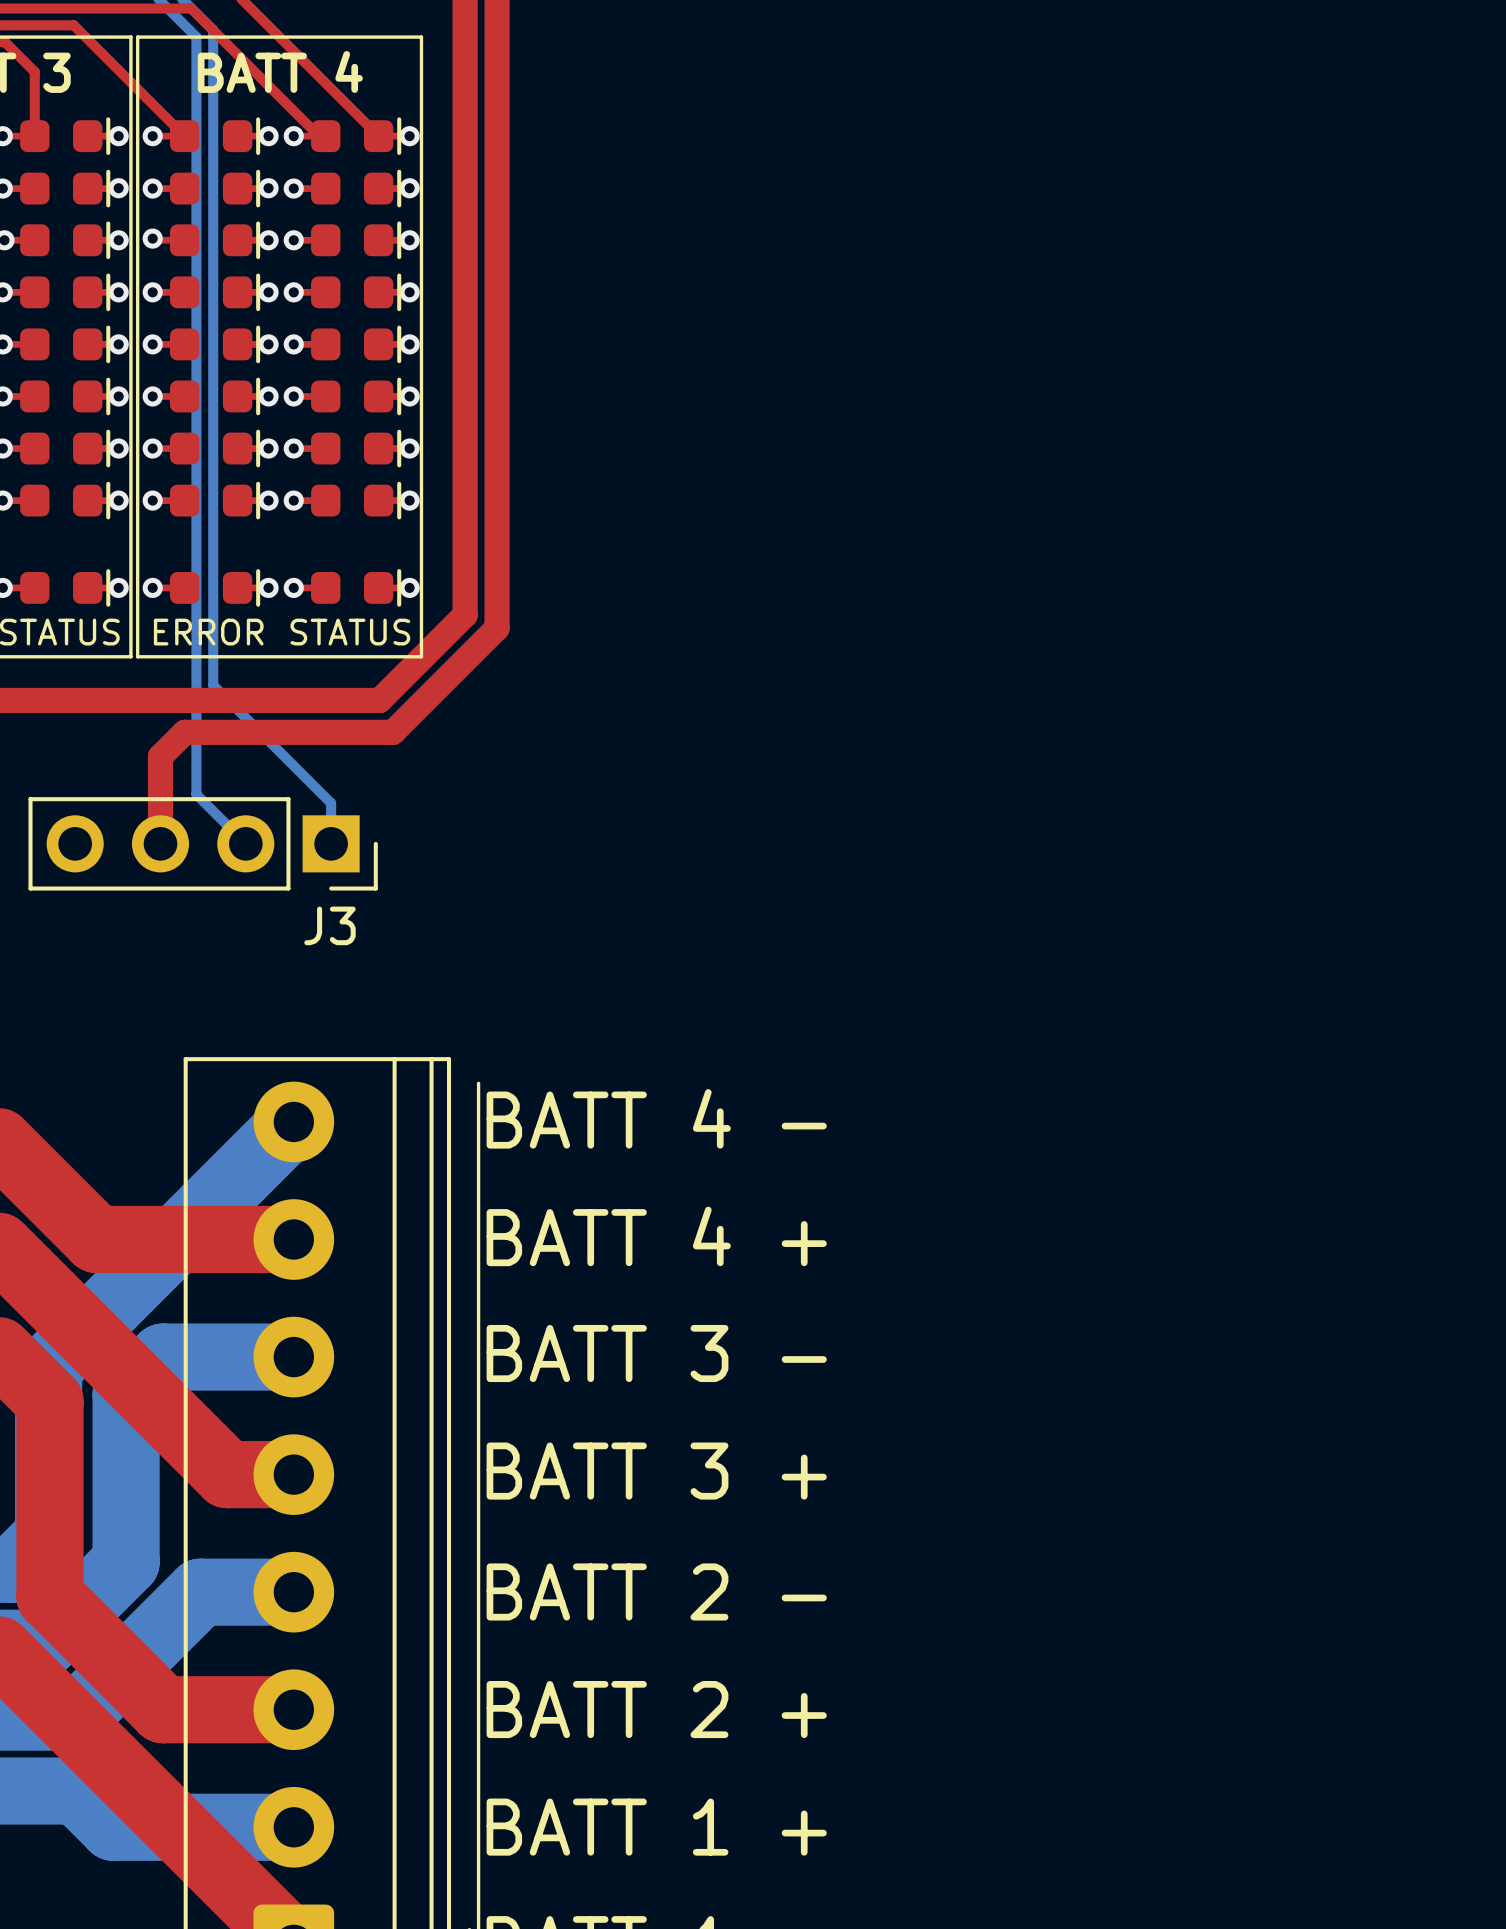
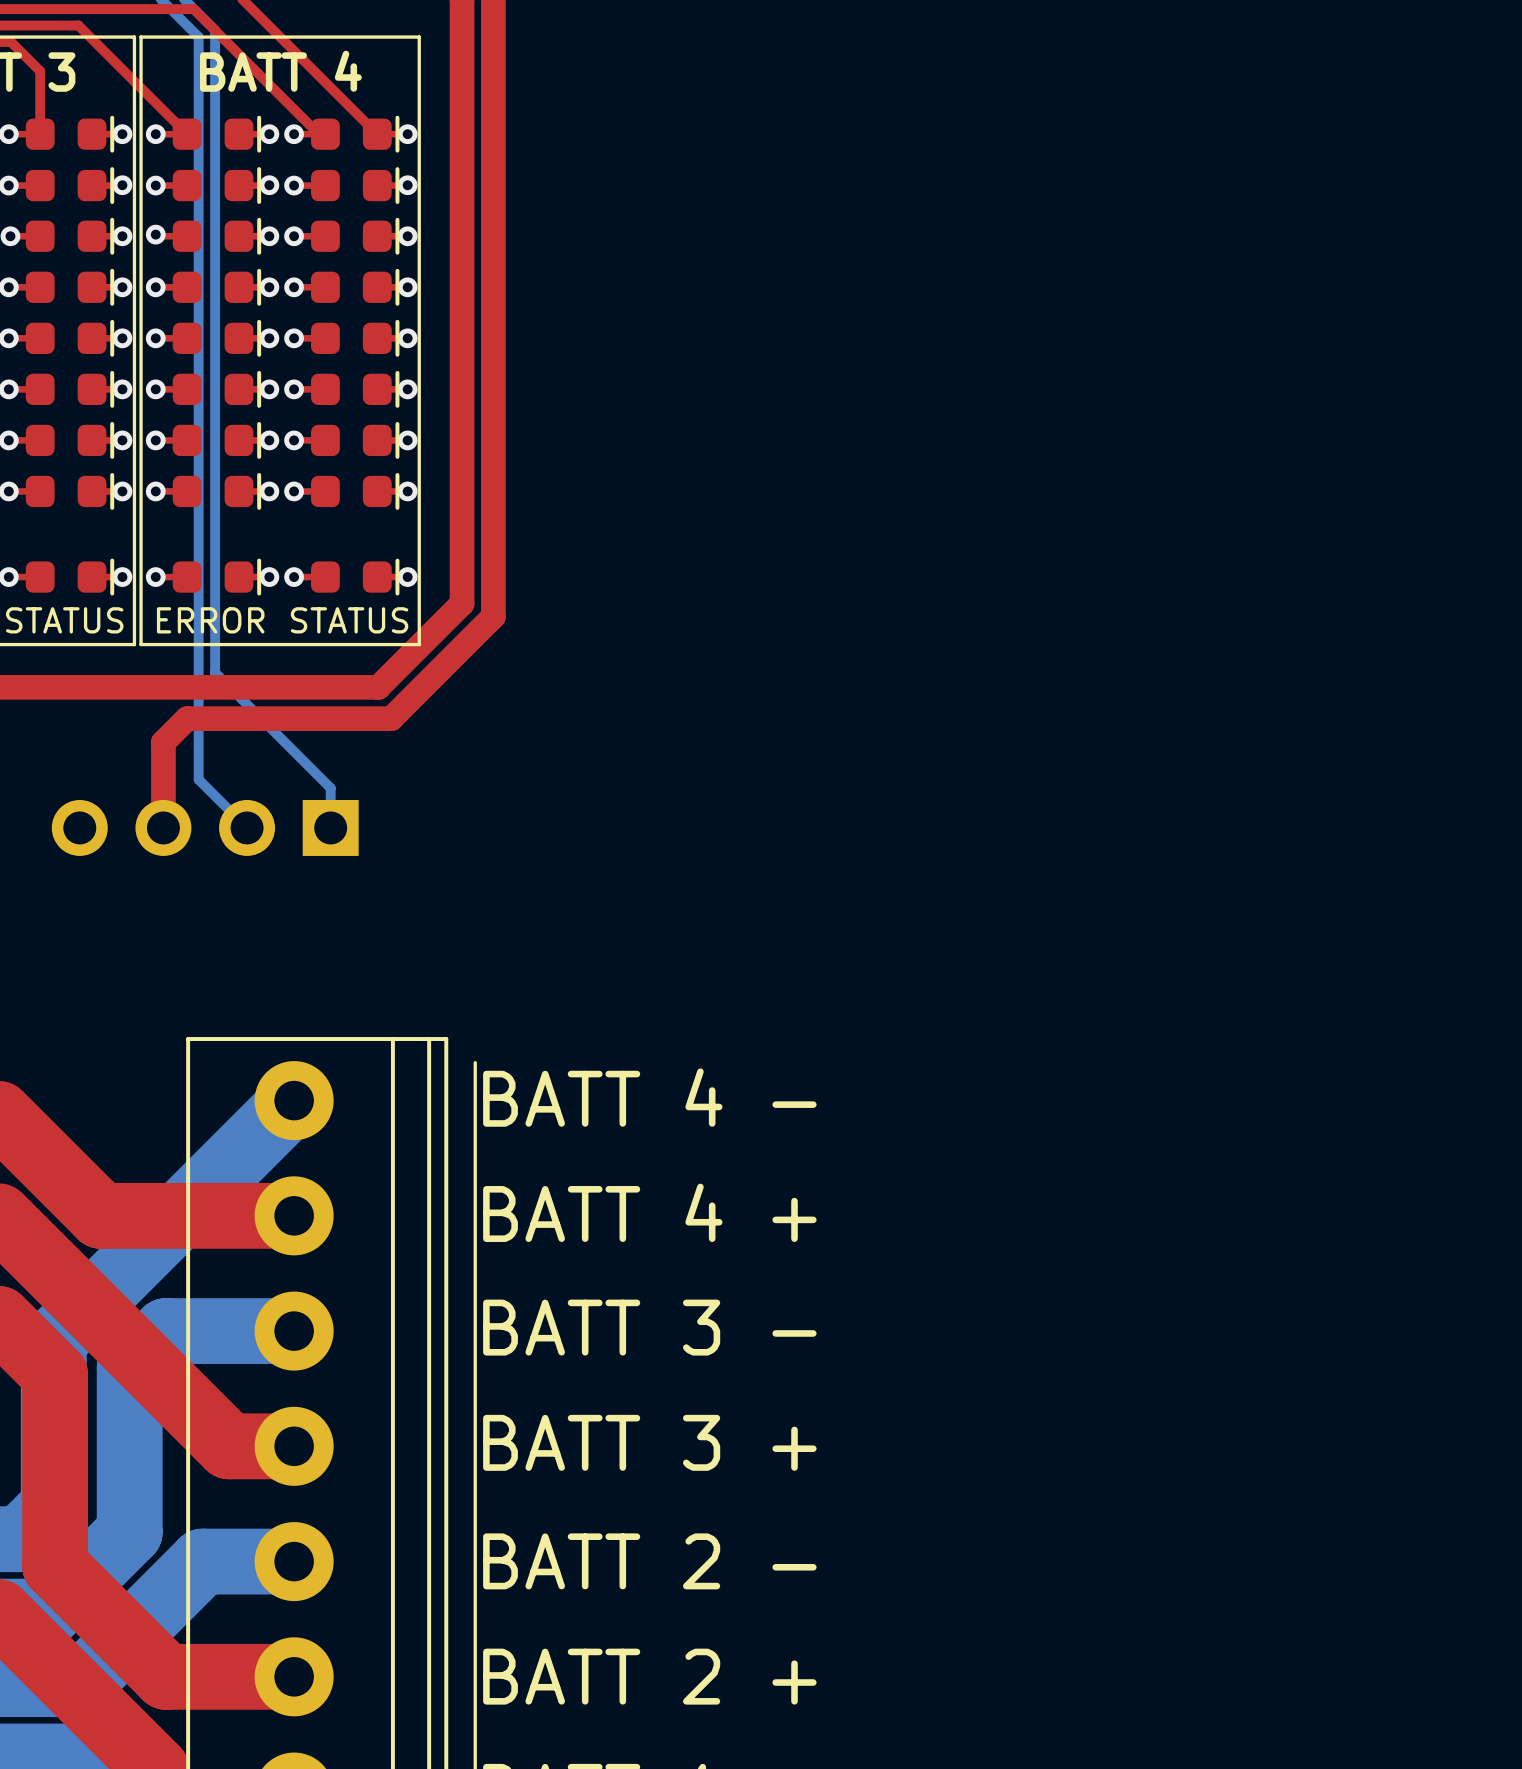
J3 side: top (203, 843) -> bottom (205, 827)

